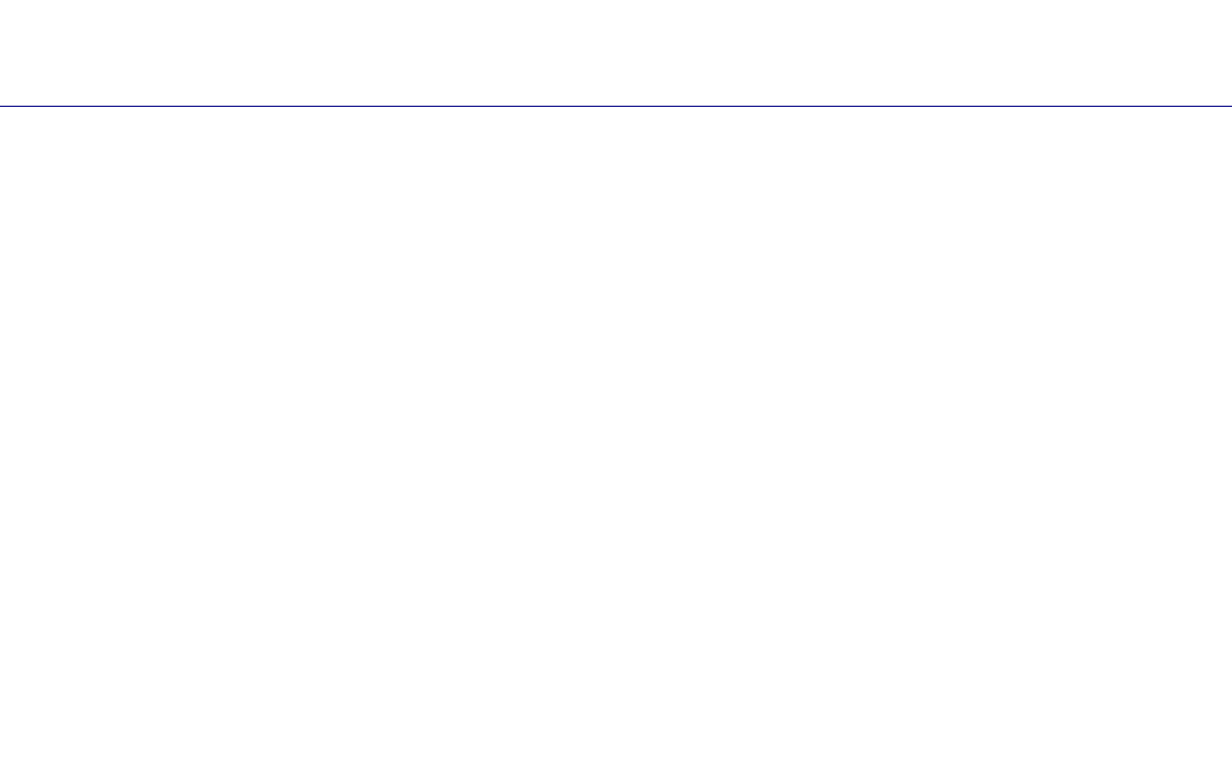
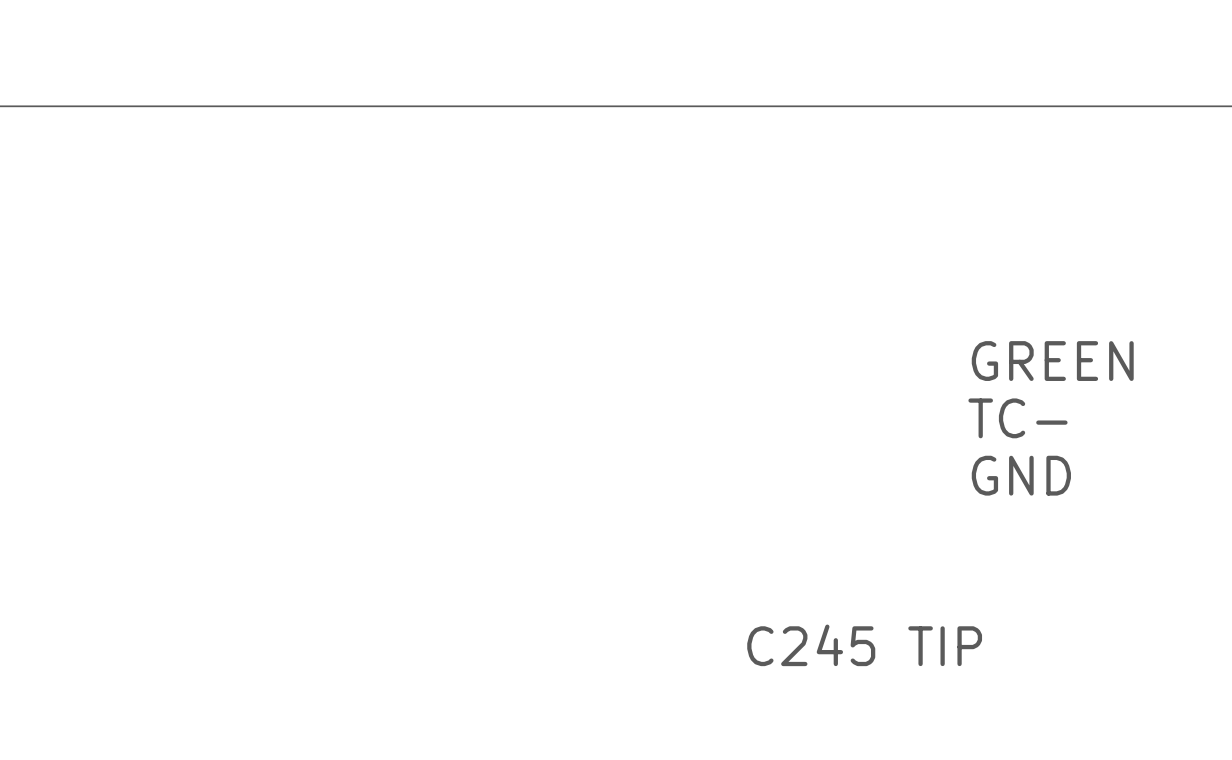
text: none -> GREEN (1052, 361)
text: none -> TC- (1017, 418)
text: none -> GND (1021, 475)
text: none -> C245 TIP (864, 645)

